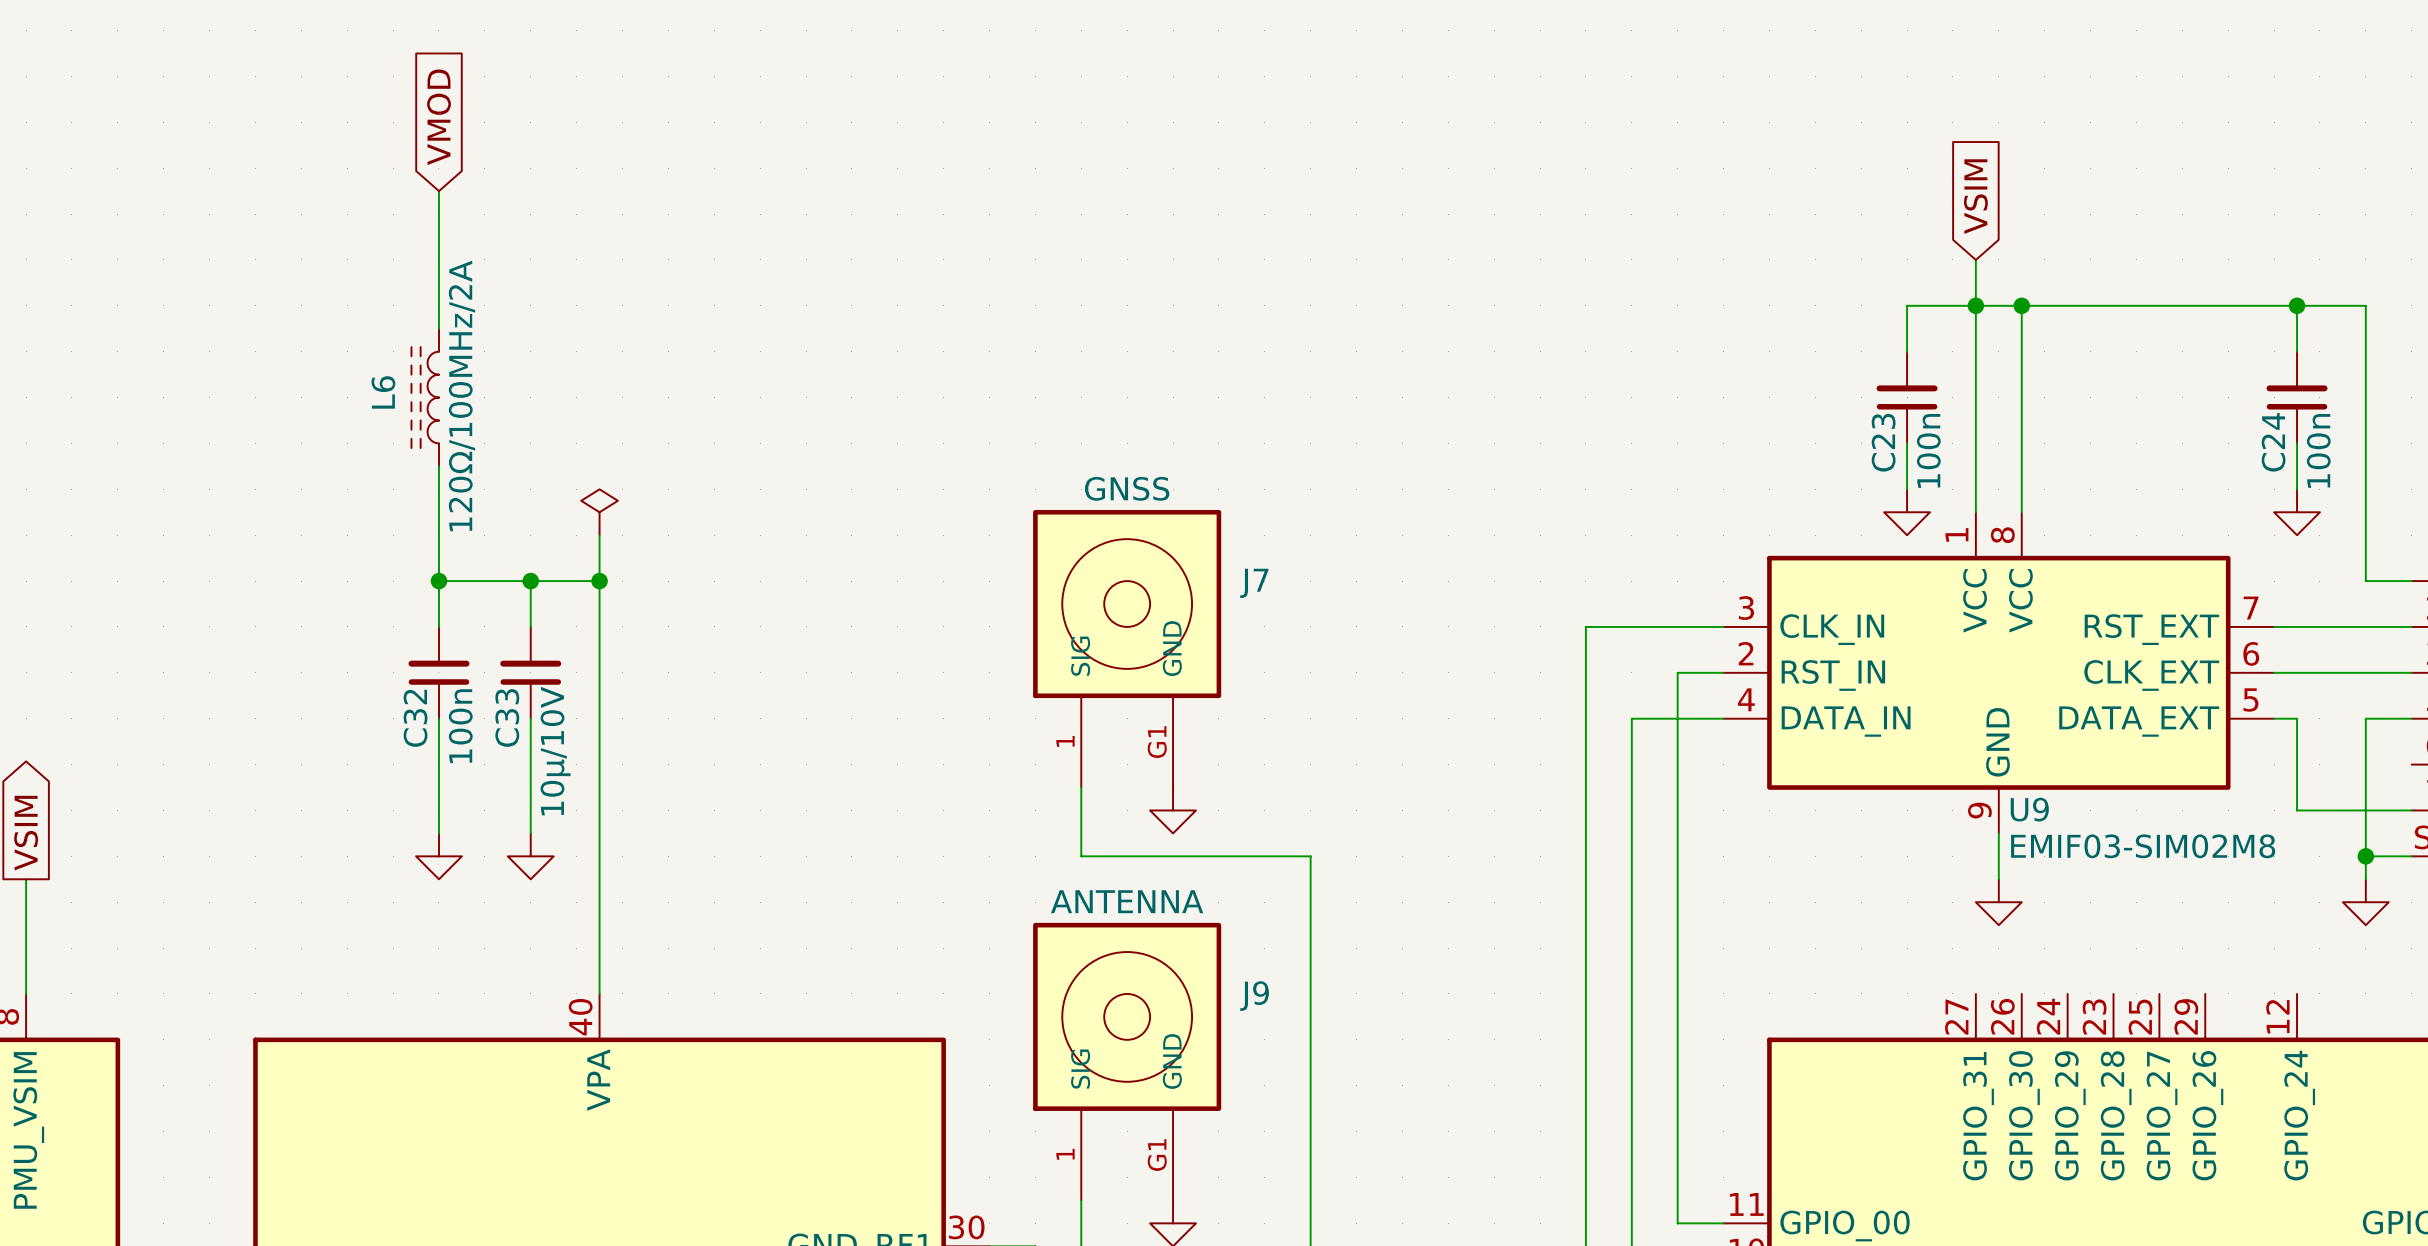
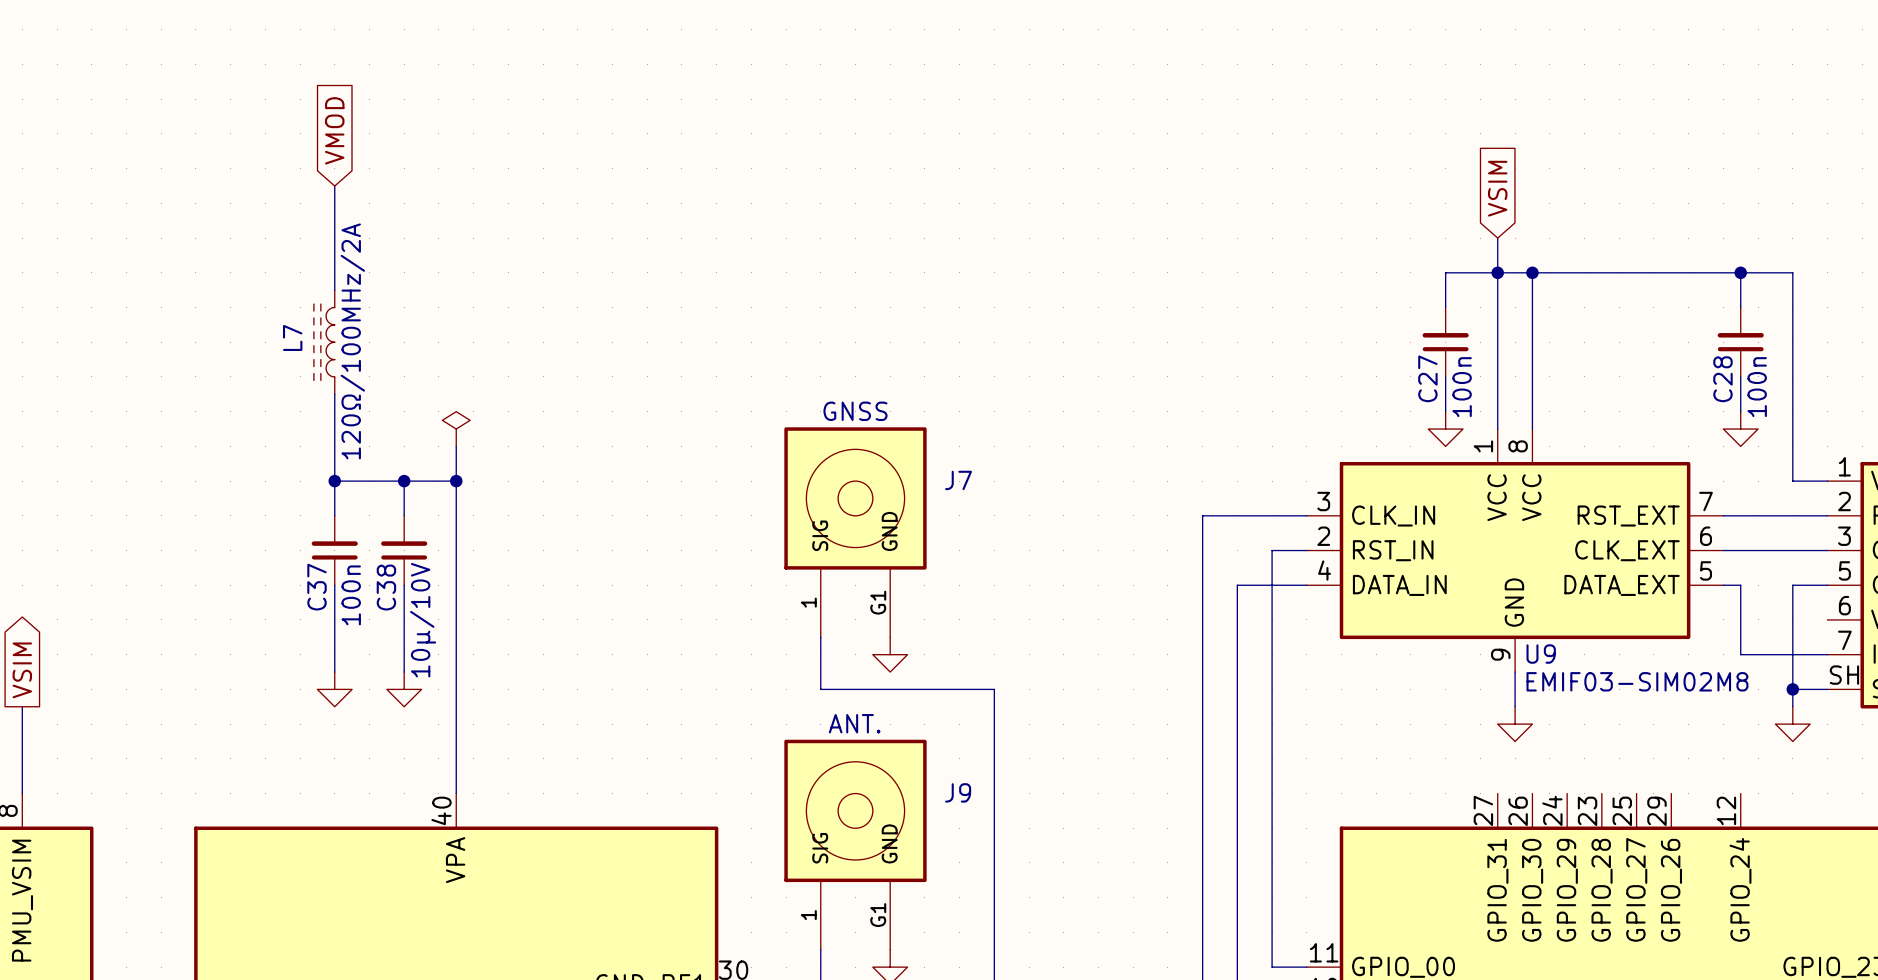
L6 name: L6 (383, 392) -> L7 (292, 337)
C23 name: C23 (1883, 442) -> C27 (1427, 378)
C24 name: C24 (2273, 442) -> C28 (1722, 379)
C33 name: C33 (507, 717) -> C38 (386, 587)
C32 name: C32 (415, 718) -> C37 (317, 587)
J9 value: ANTENNA (1127, 901) -> ANT. (854, 723)

